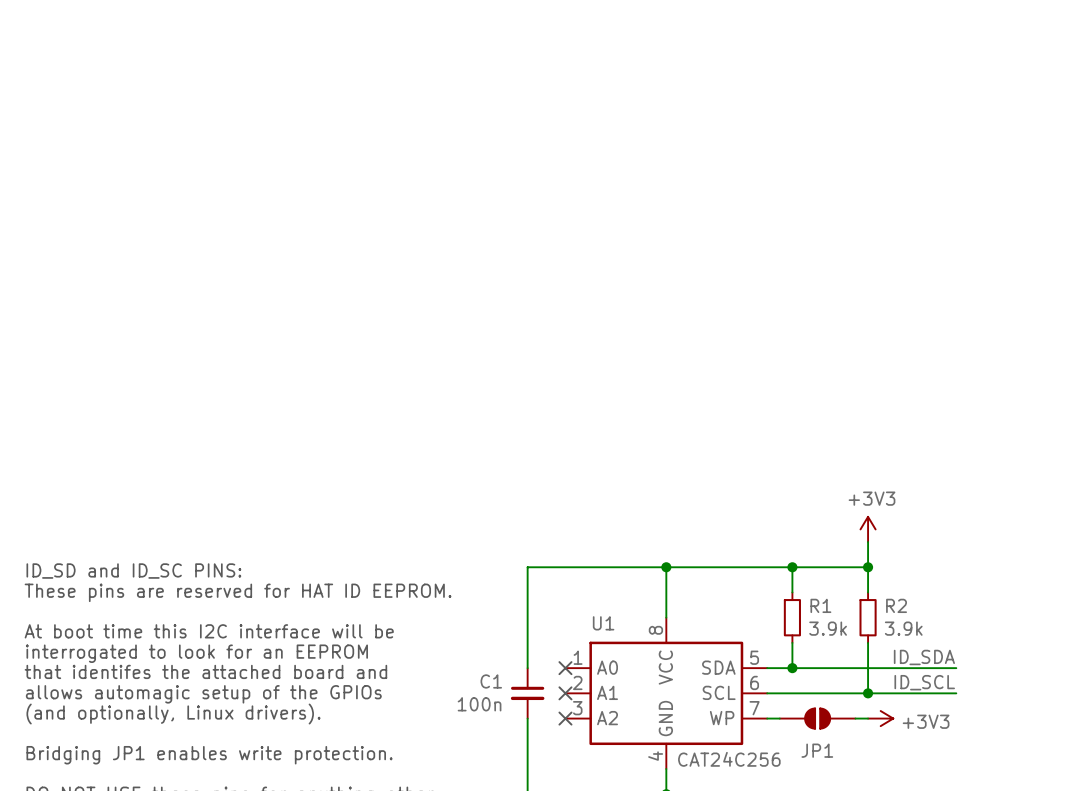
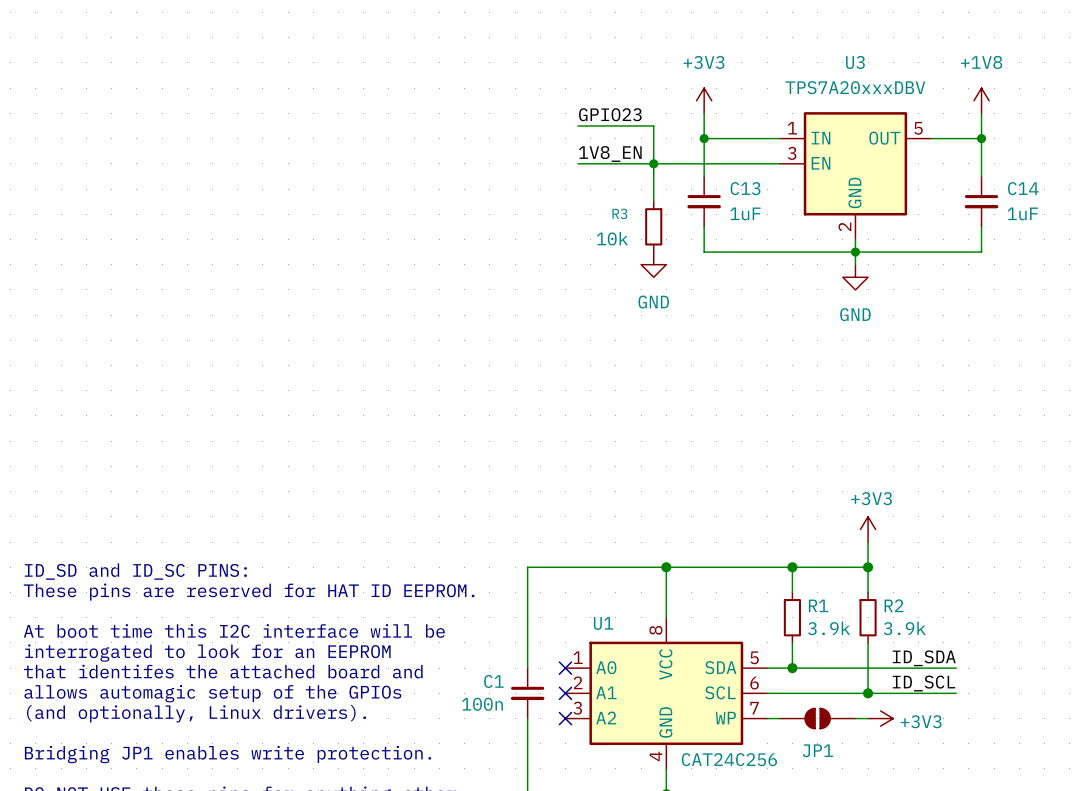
power symbol: none -> +3V3 (704, 100)
power symbol: none -> +1V8 (981, 100)
wire: none -> (704, 113) (704, 176)
wire: none -> (981, 113) (981, 176)
label: none -> GPIO23 (610, 114)
wire: none -> (578, 125) (653, 125) (653, 201)
wire: none -> (704, 138) (779, 138)
junction: none -> (704, 138)
wire: none -> (931, 138) (981, 138)
junction: none -> (981, 138)
label: none -> 1V8_EN (610, 153)
wire: none -> (578, 163) (779, 163)
junction: none -> (653, 163)
U3: none -> TPS7A20xxxDBV (855, 175)
C13: none -> 1uF (704, 201)
C14: none -> 1uF (981, 201)
R3: none -> 10k (653, 226)
wire: none -> (704, 226) (704, 252) (981, 252) (981, 226)
wire: none -> (855, 239) (855, 264)
junction: none -> (855, 252)
power symbol: none -> GND (653, 264)
power symbol: none -> GND (855, 277)

